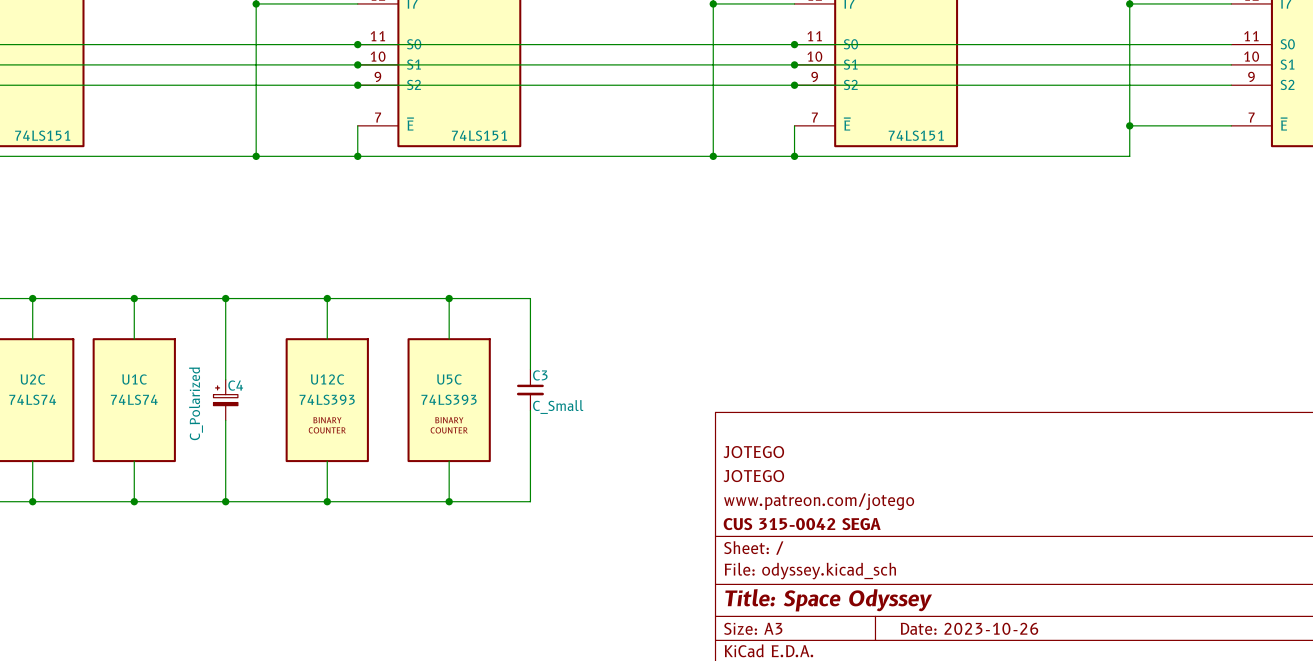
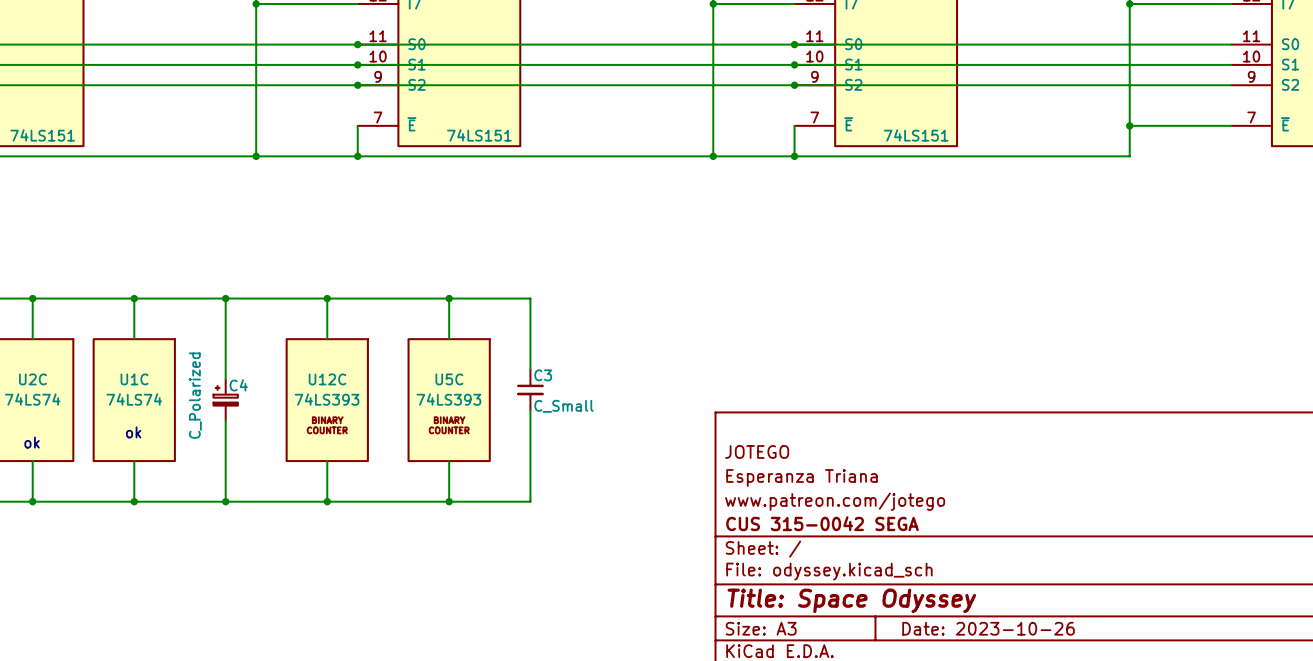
text: none -> ok (133, 432)
text: none -> ok (32, 442)
title block: JOTEGO (753, 476) -> Esperanza Triana (802, 477)

